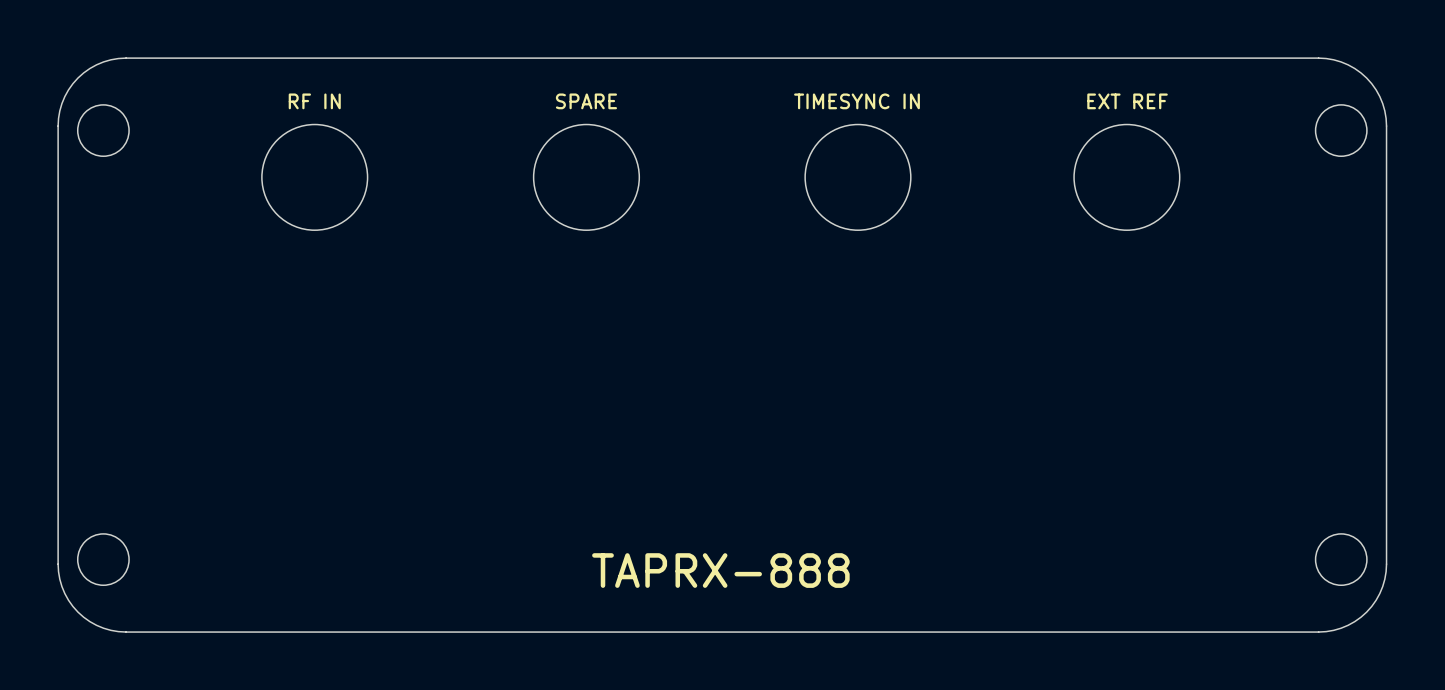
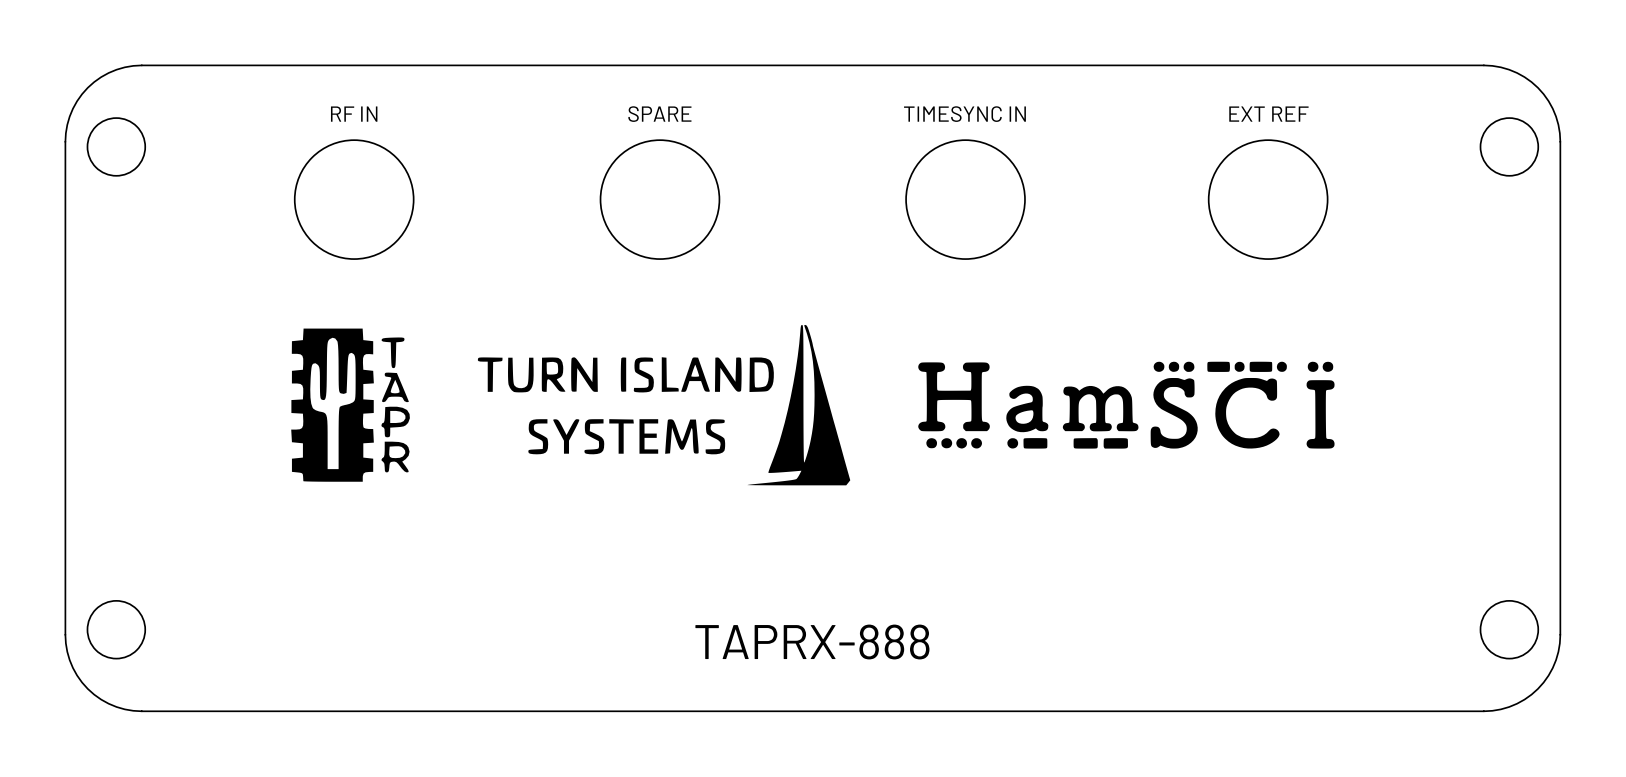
drawing: none -> [620, 324, 851, 486]
drawing: none -> [291, 328, 410, 482]
drawing: none -> [477, 357, 598, 393]
drawing: none -> [918, 361, 1287, 449]
drawing: none -> [1306, 361, 1335, 449]
drawing: none -> [528, 419, 726, 455]

